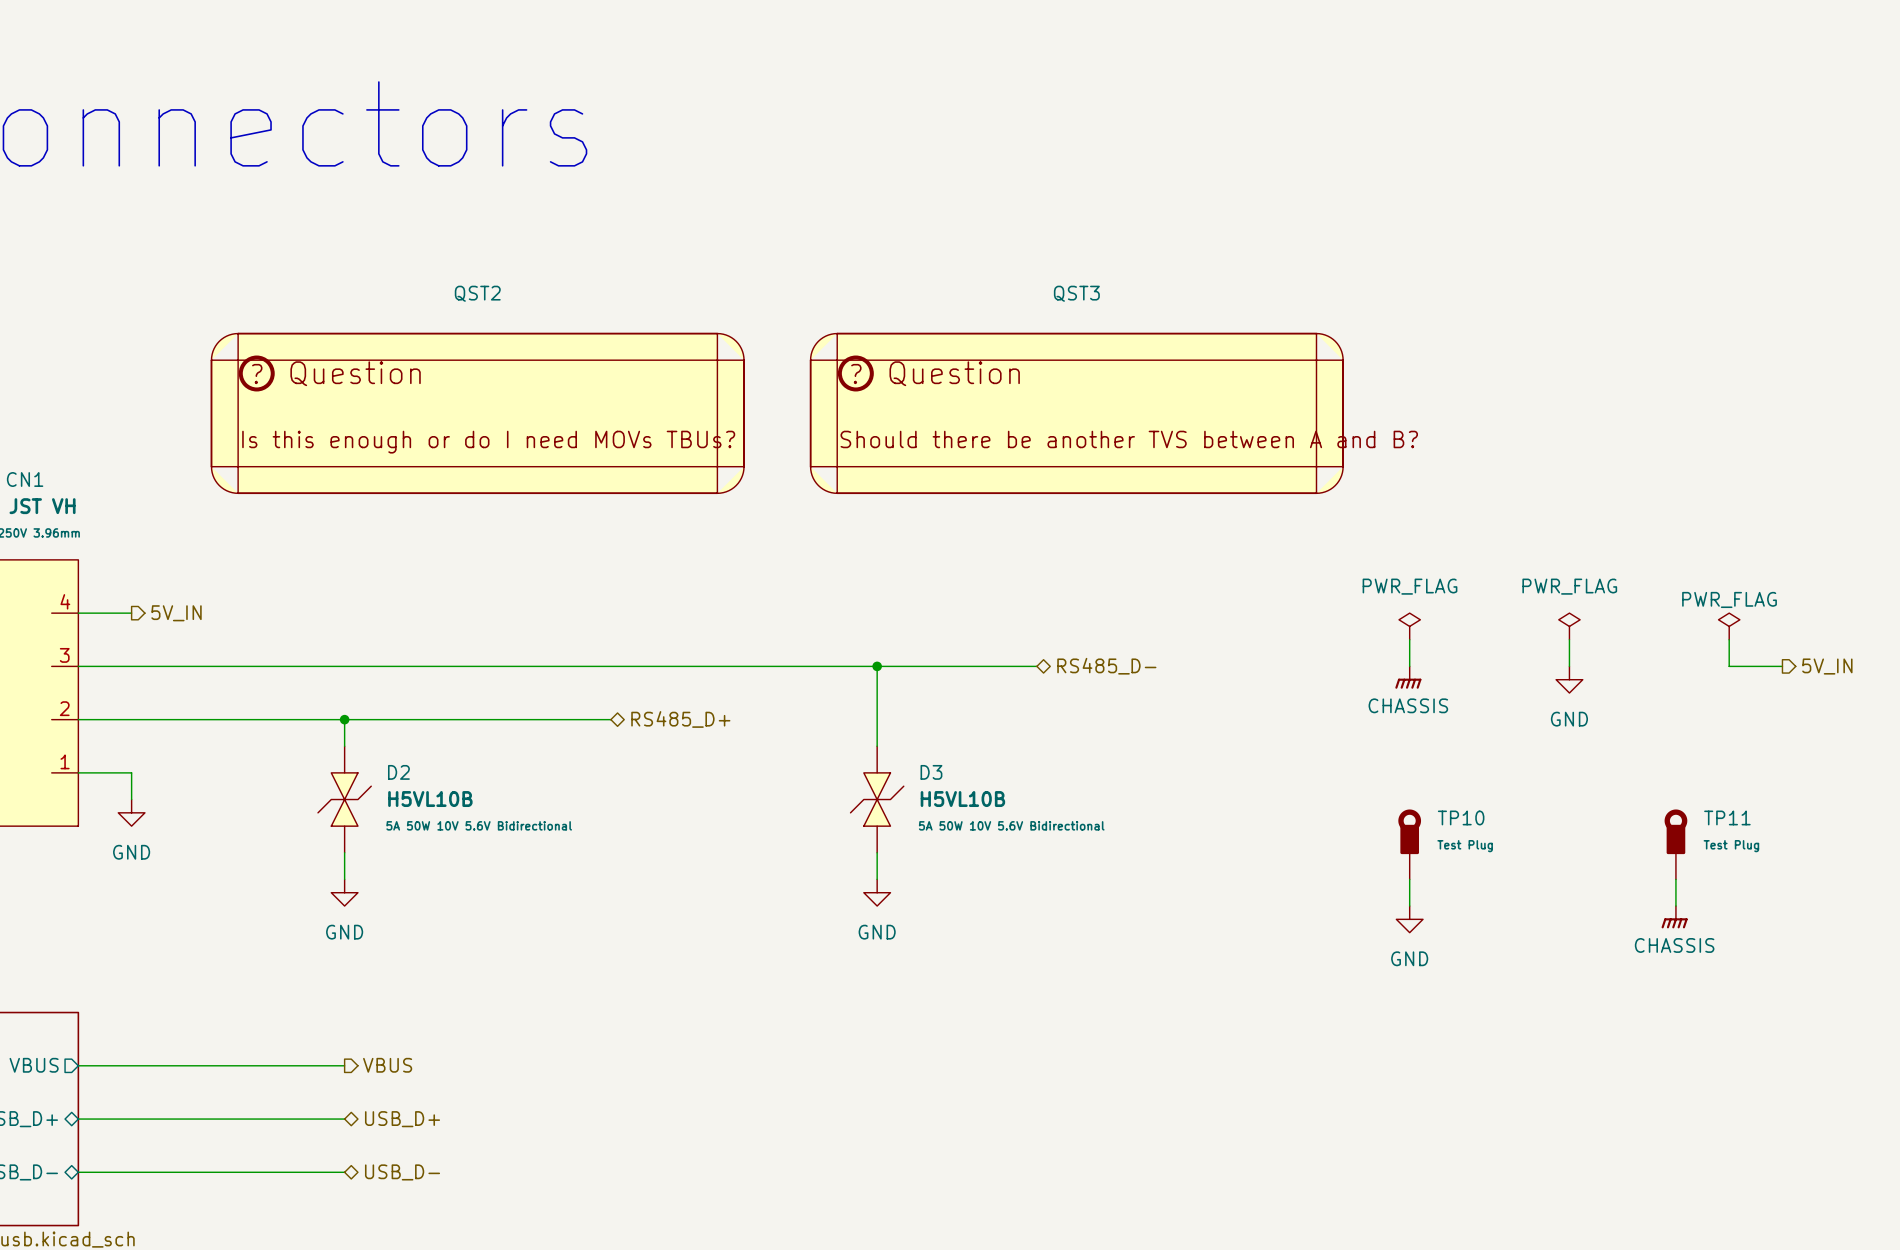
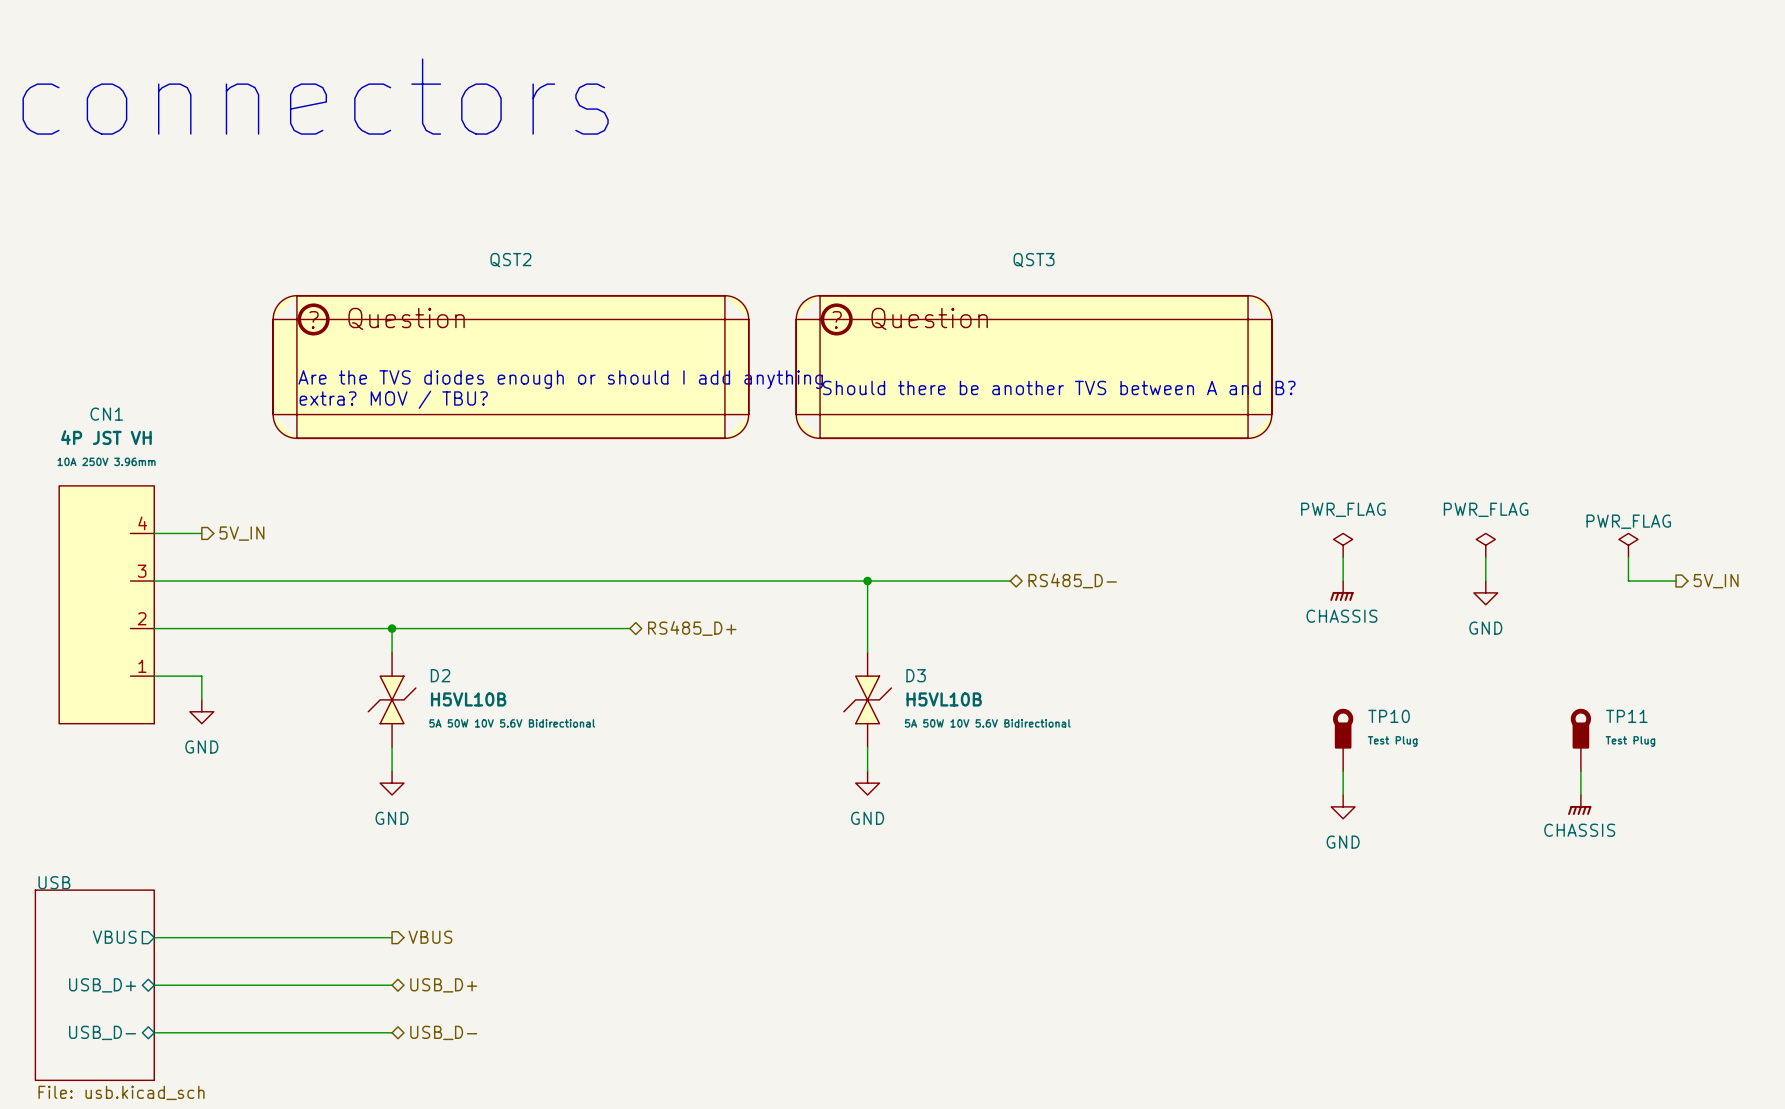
QST2 symbol: [211, 333, 745, 494] -> [273, 295, 749, 439]
QST3 symbol: [810, 333, 1344, 494] -> [796, 295, 1272, 439]
text: none -> Are the TVS diodes enough or should I add anything (560, 379)
text: none -> Should there be another TVS between A and B? (1059, 387)
text: none -> extra? MOV / TBU? (393, 399)

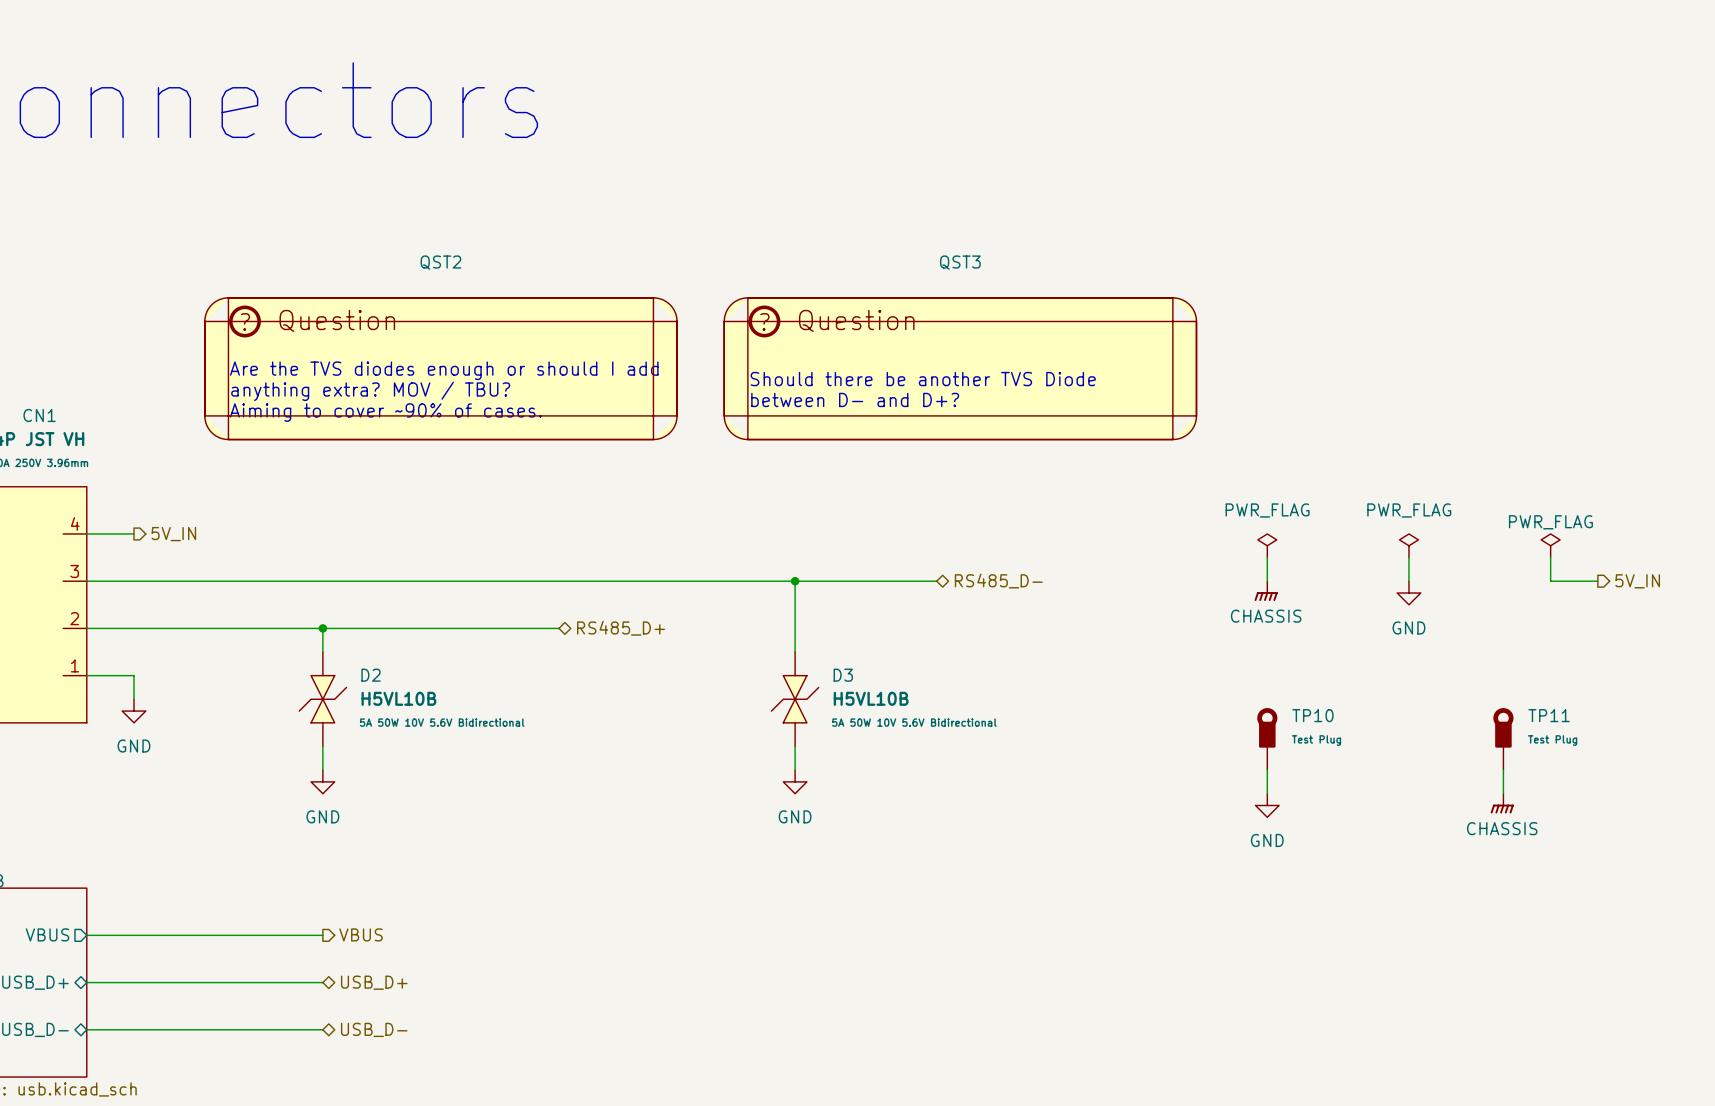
text: Are the TVS diodes enough or should I add anything (560, 379) -> Are the TVS diodes enough or should I add (444, 370)
text: Should there be another TVS between A and B? (1059, 387) -> Should there be another TVS Diode (923, 379)
text: none -> between D- and D+? (855, 399)
text: extra? MOV / TBU? (393, 399) -> anything extra? MOV / TBU? (370, 391)
text: none -> Aiming to cover ~90% of cases. (385, 412)

